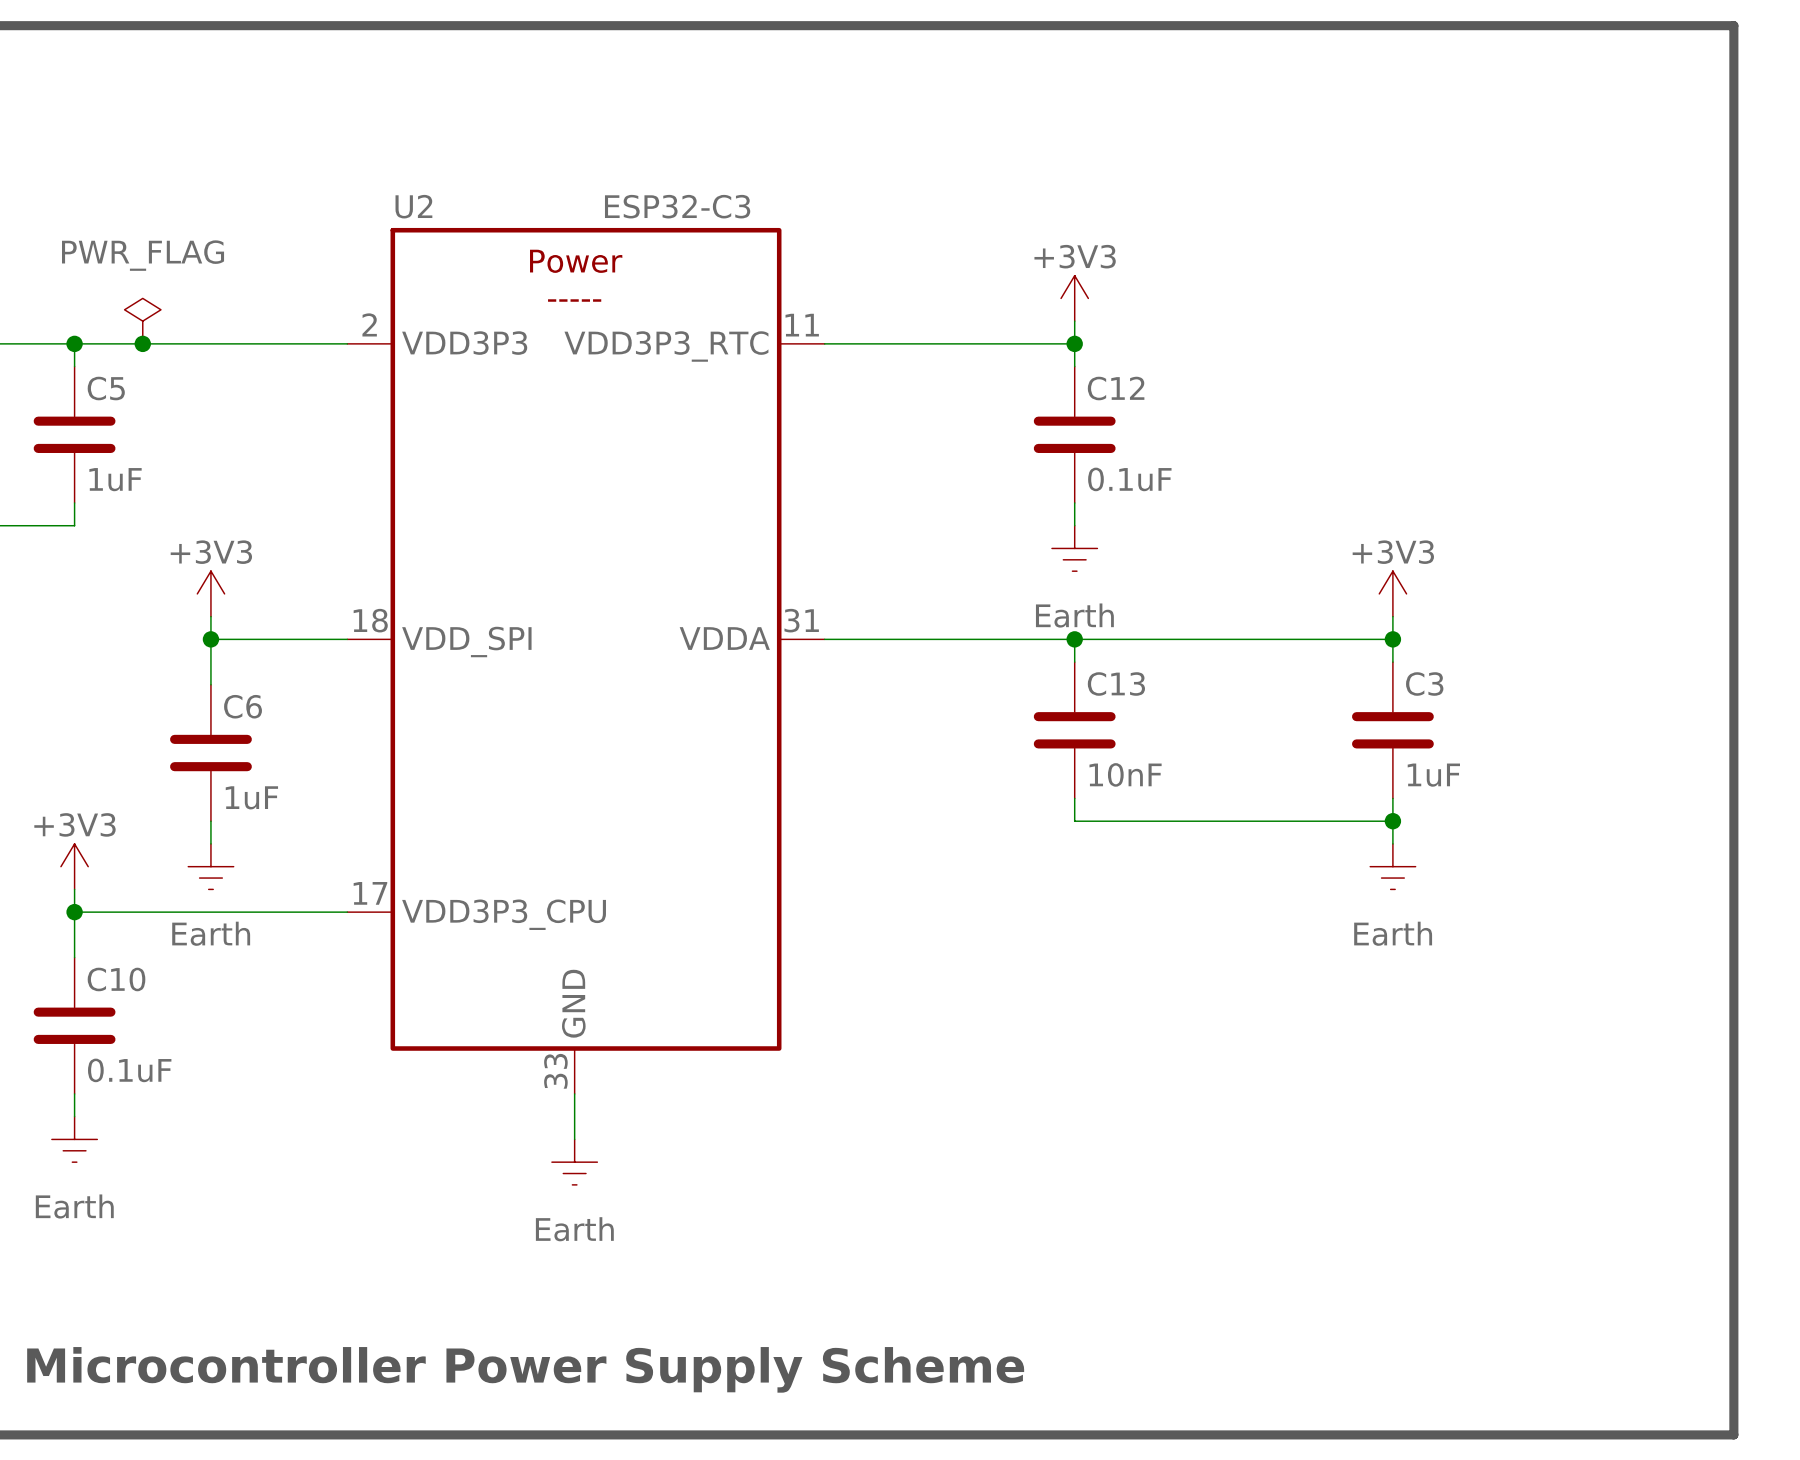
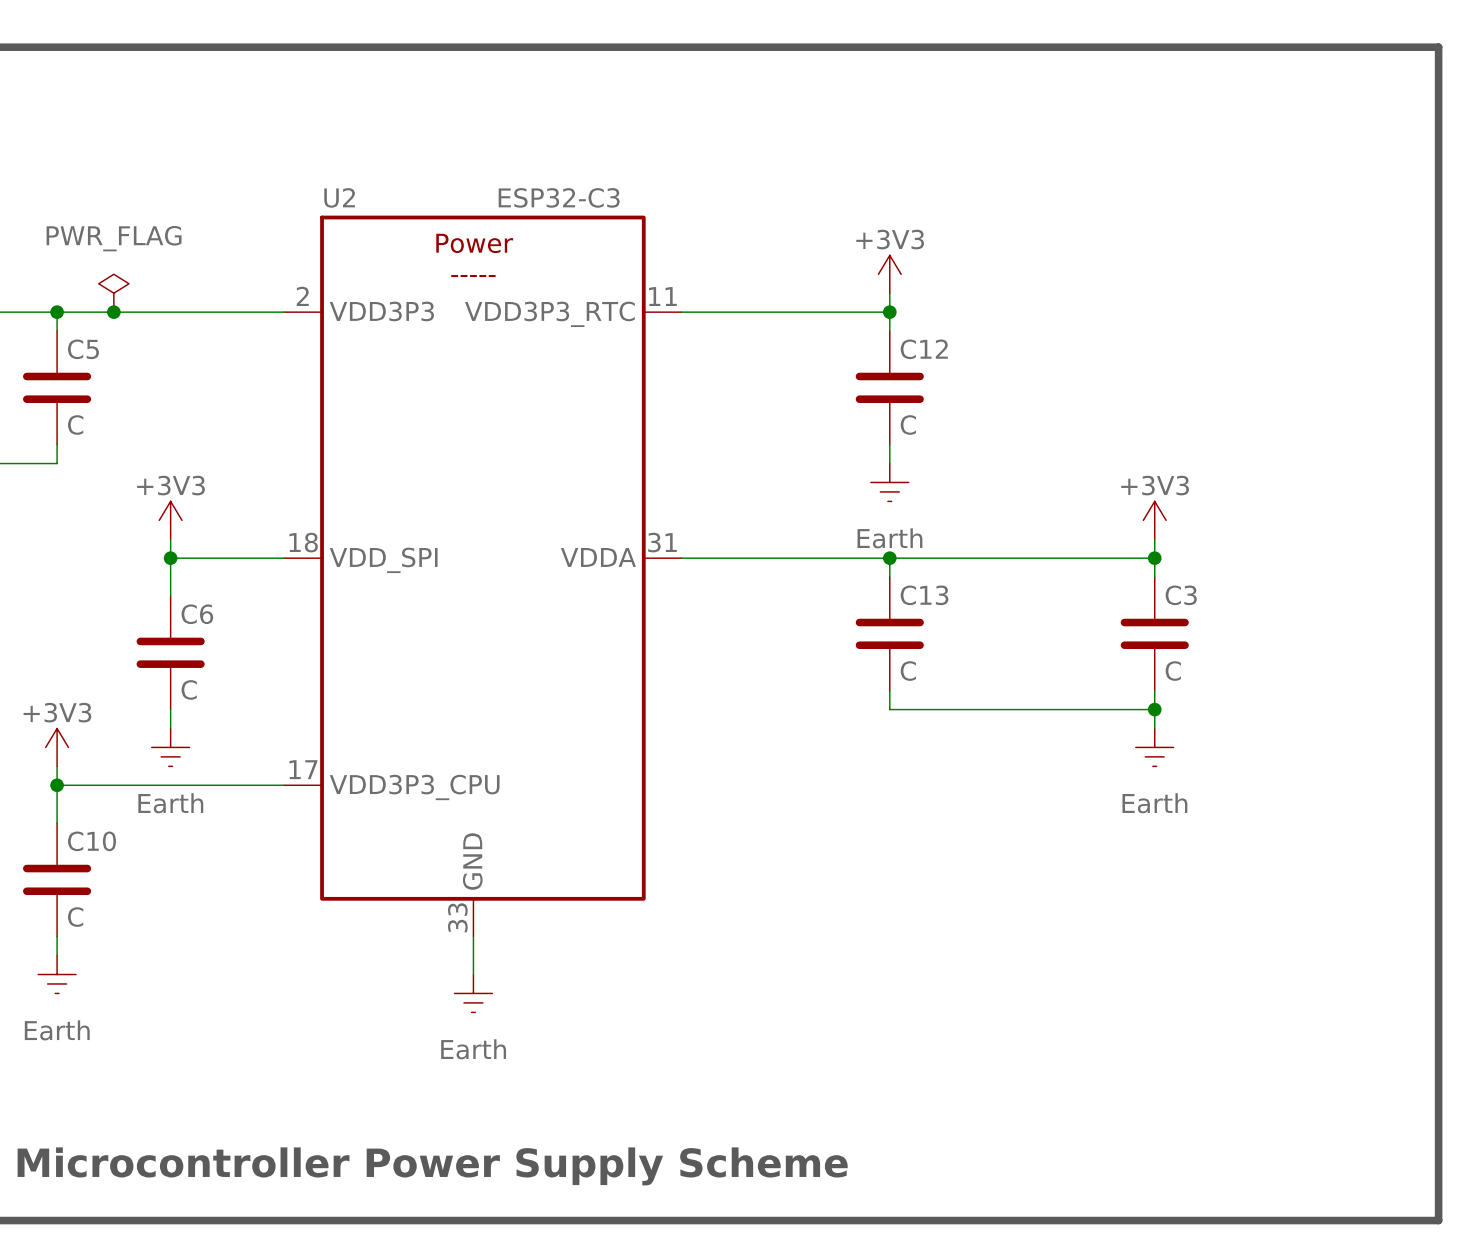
C5 value: 1uF (115, 479) -> C (75, 425)
C12 value: 0.1uF (1129, 479) -> C (908, 425)
C13 value: 10nF (1125, 774) -> C (908, 671)
C3 value: 1uF (1433, 775) -> C (1173, 671)
C6 value: 1uF (251, 797) -> C (189, 689)
C10 value: 0.1uF (129, 1070) -> C (75, 917)

